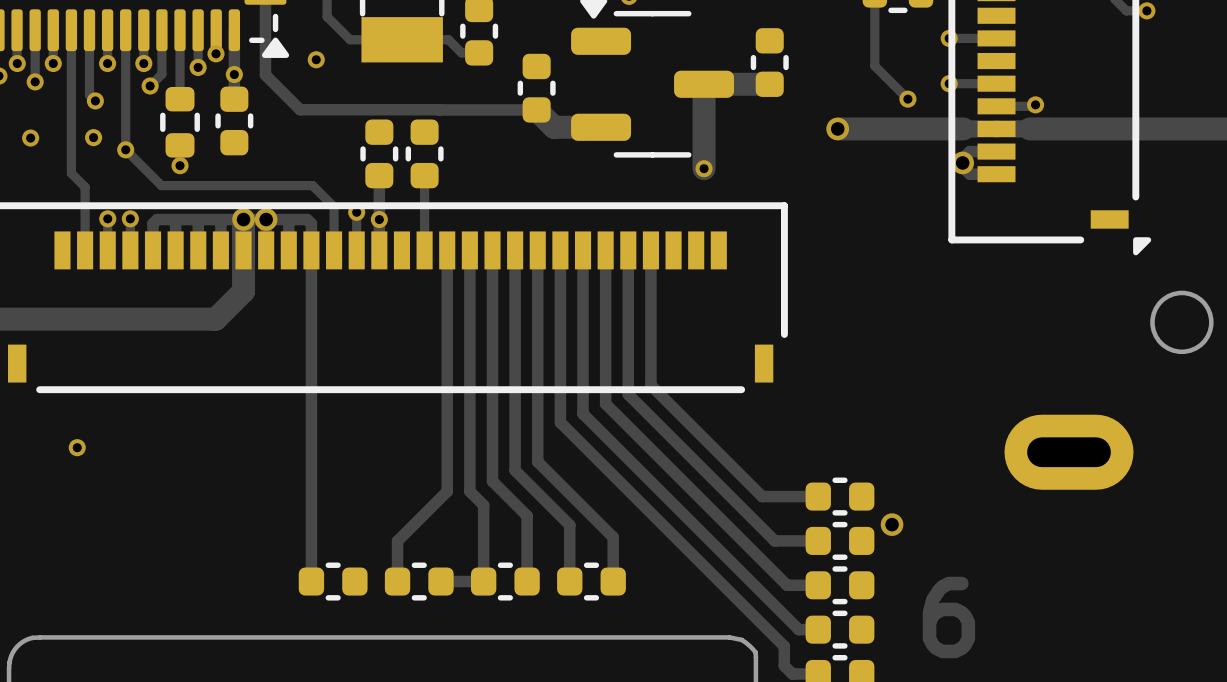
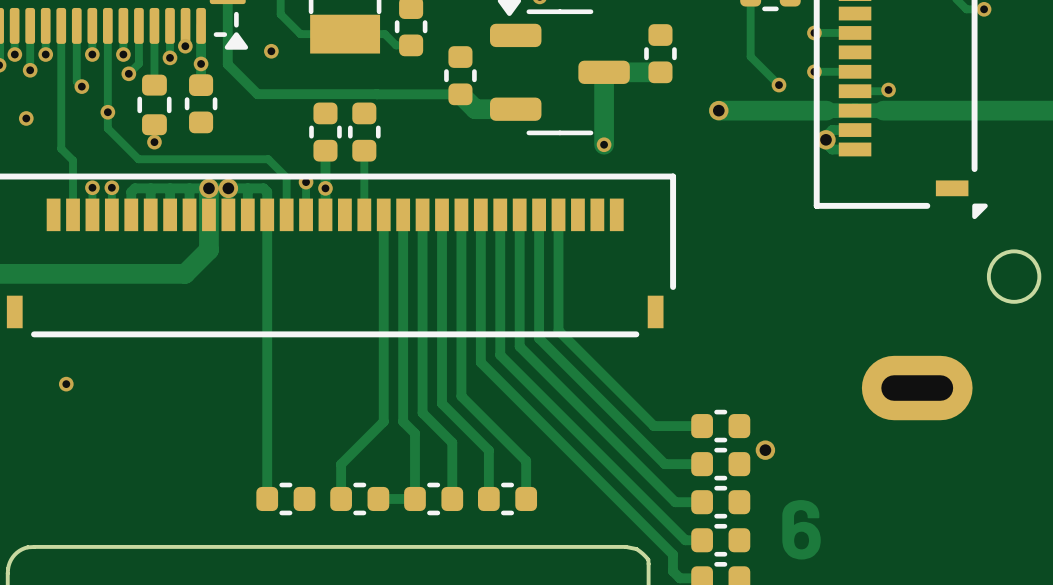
via: none -> (107, 112)
via: (93, 137) -> none
via: (125, 149) -> none

